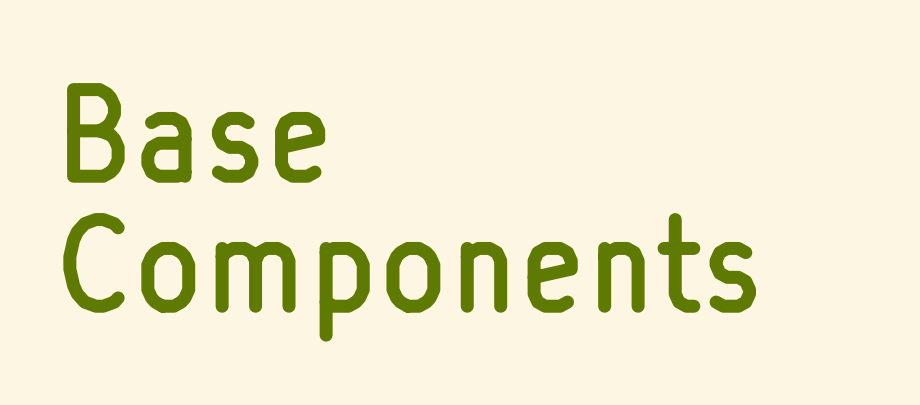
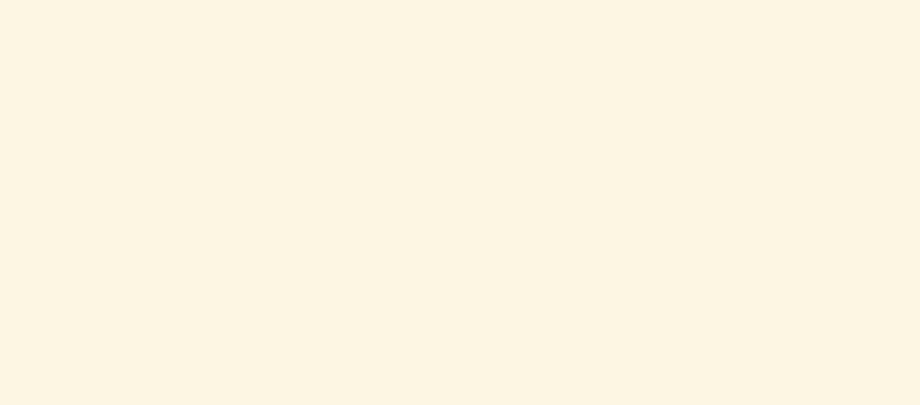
text: Base (196, 132) -> none
text: Components (409, 277) -> none

